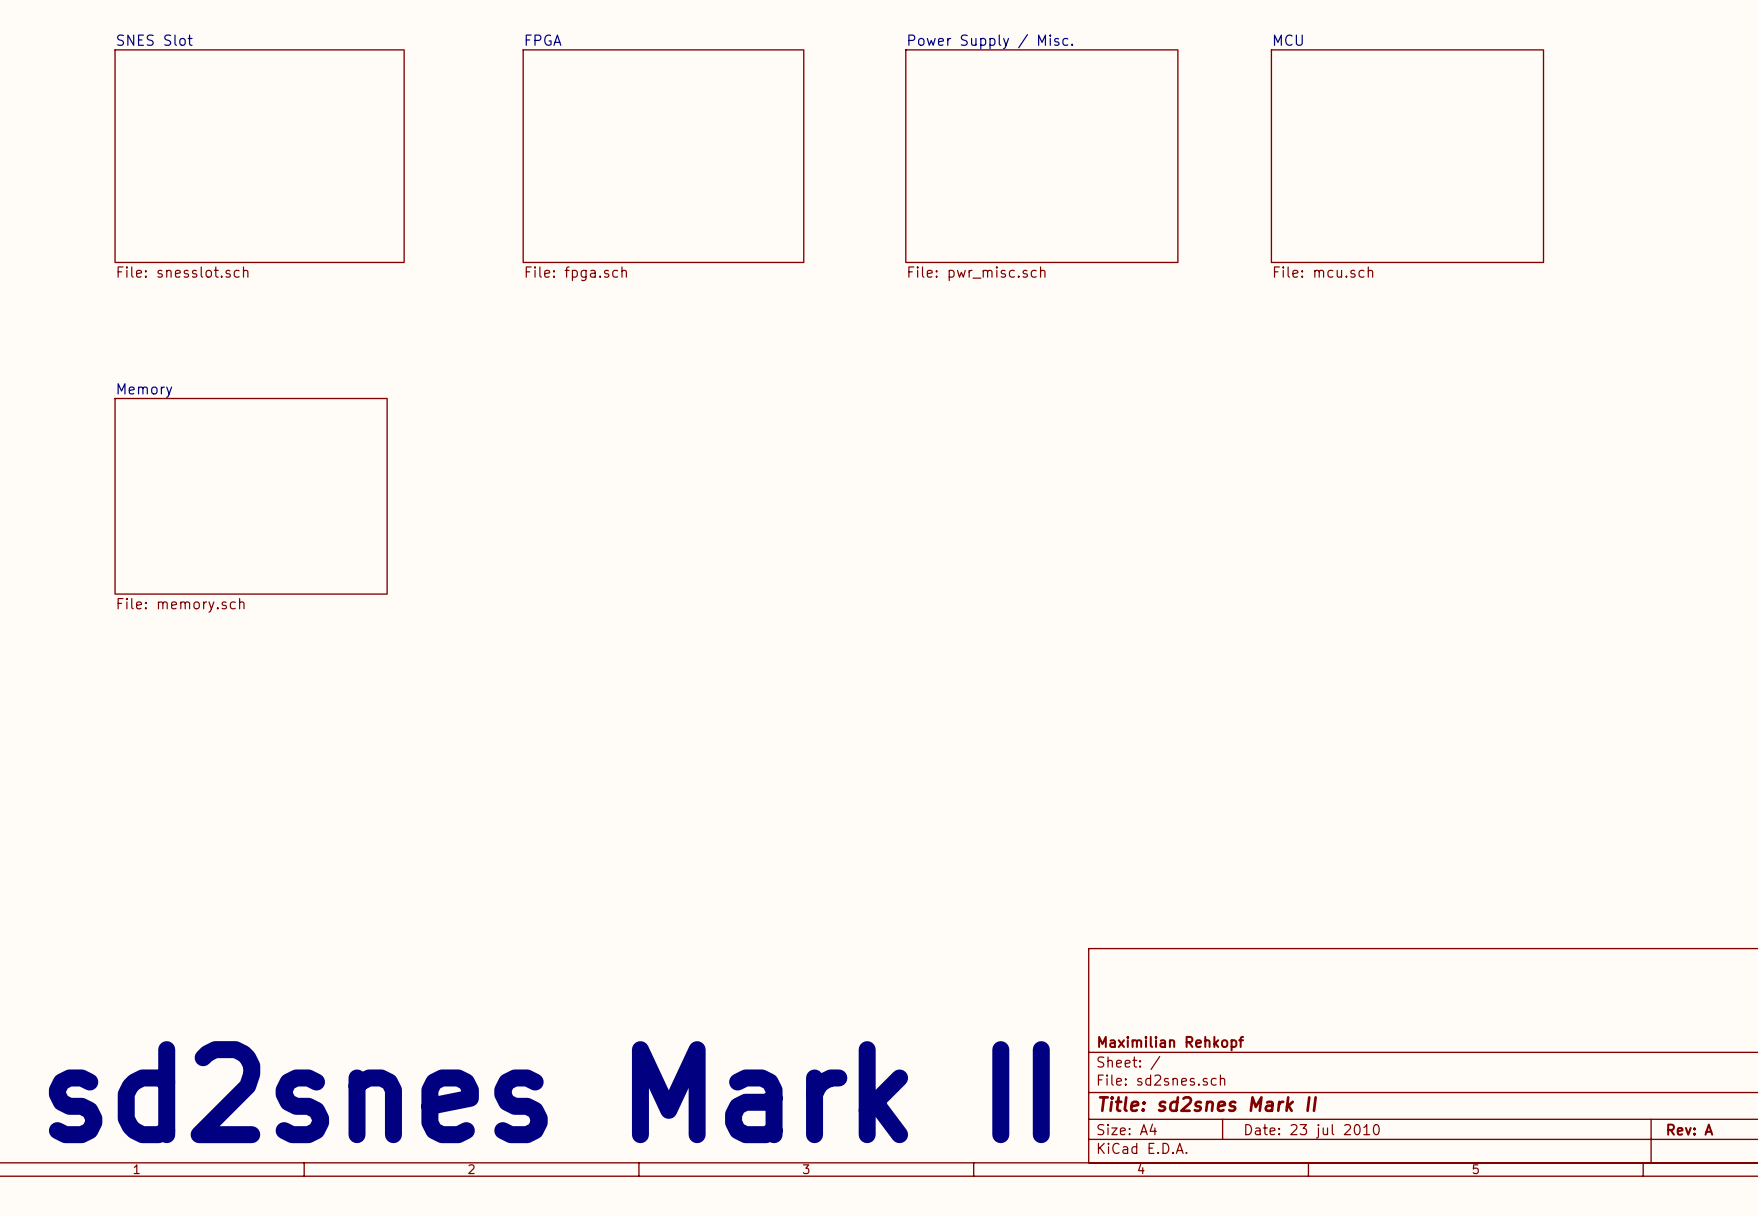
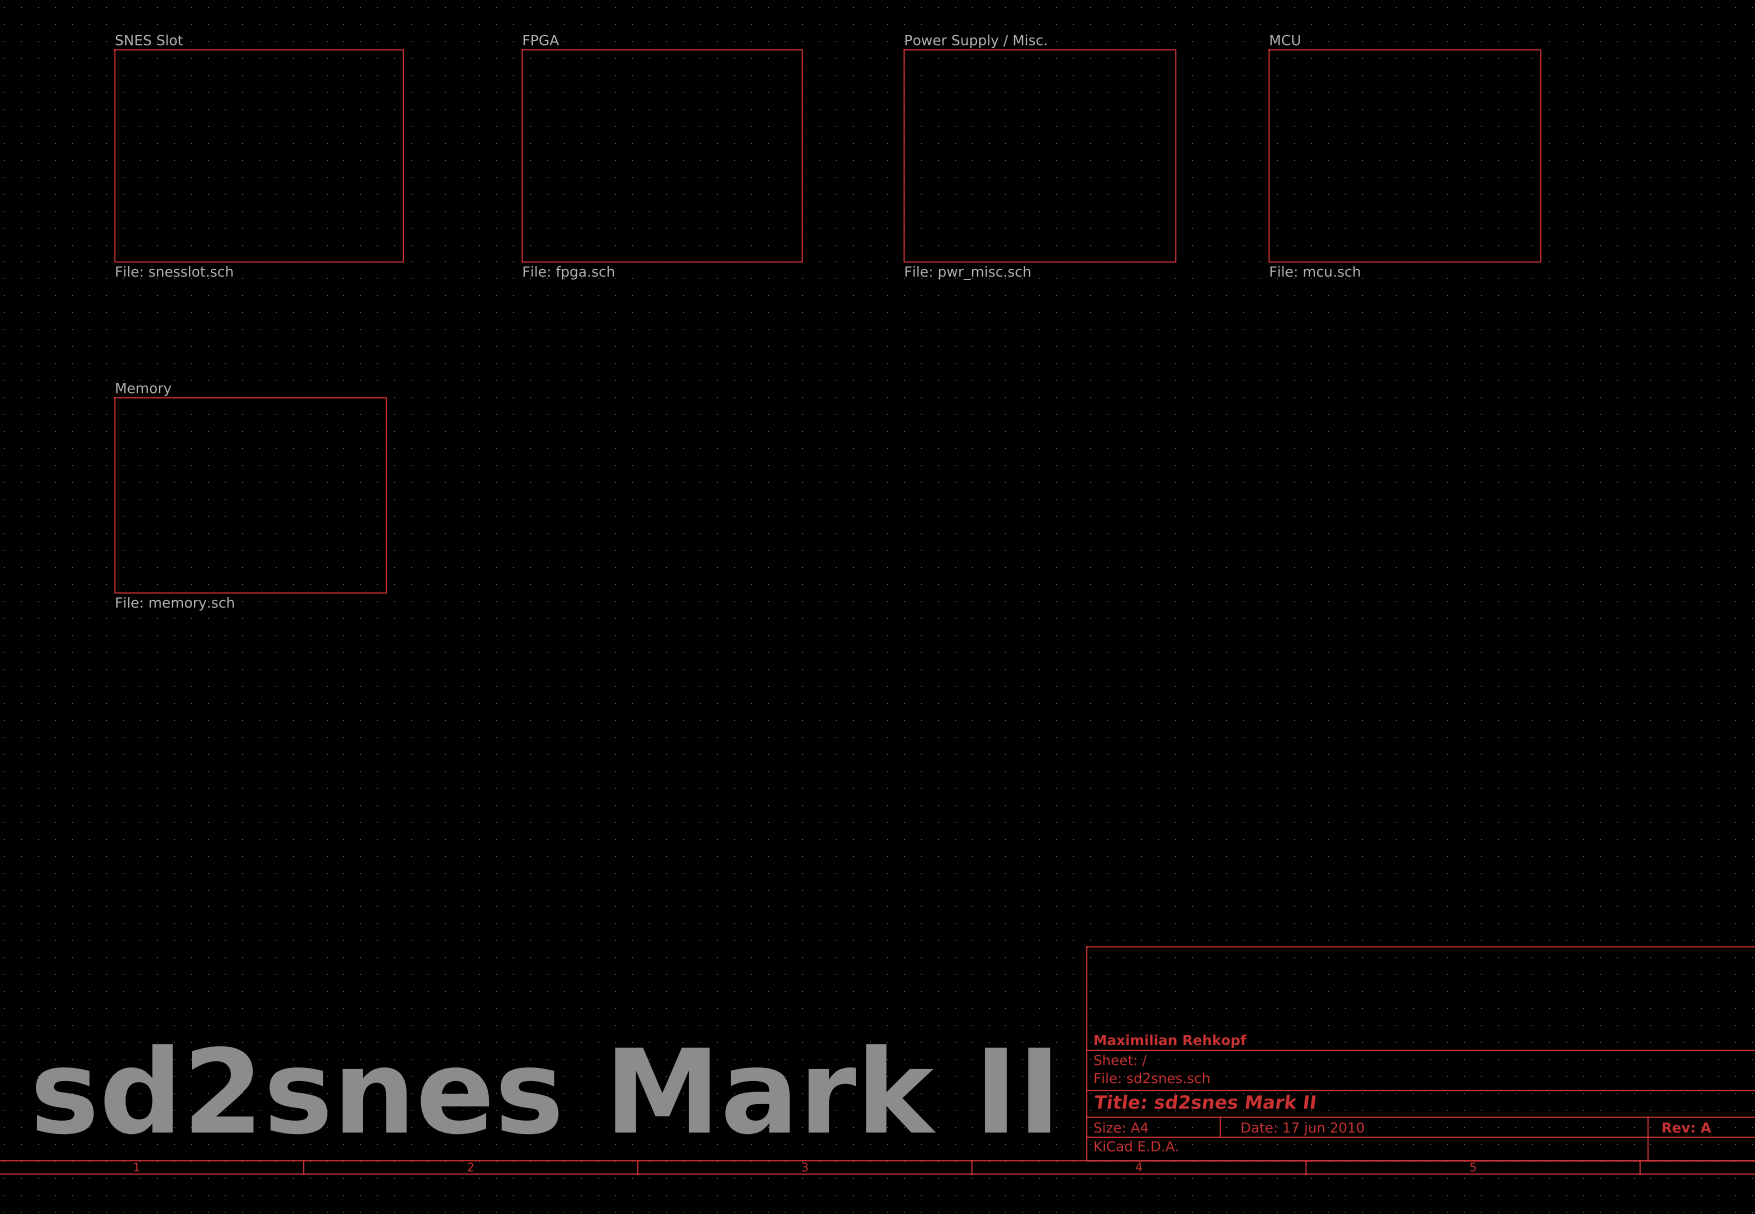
title block: Date: 23 jul 2010 (1312, 1131) -> Date: 17 jun 2010 (1302, 1128)

